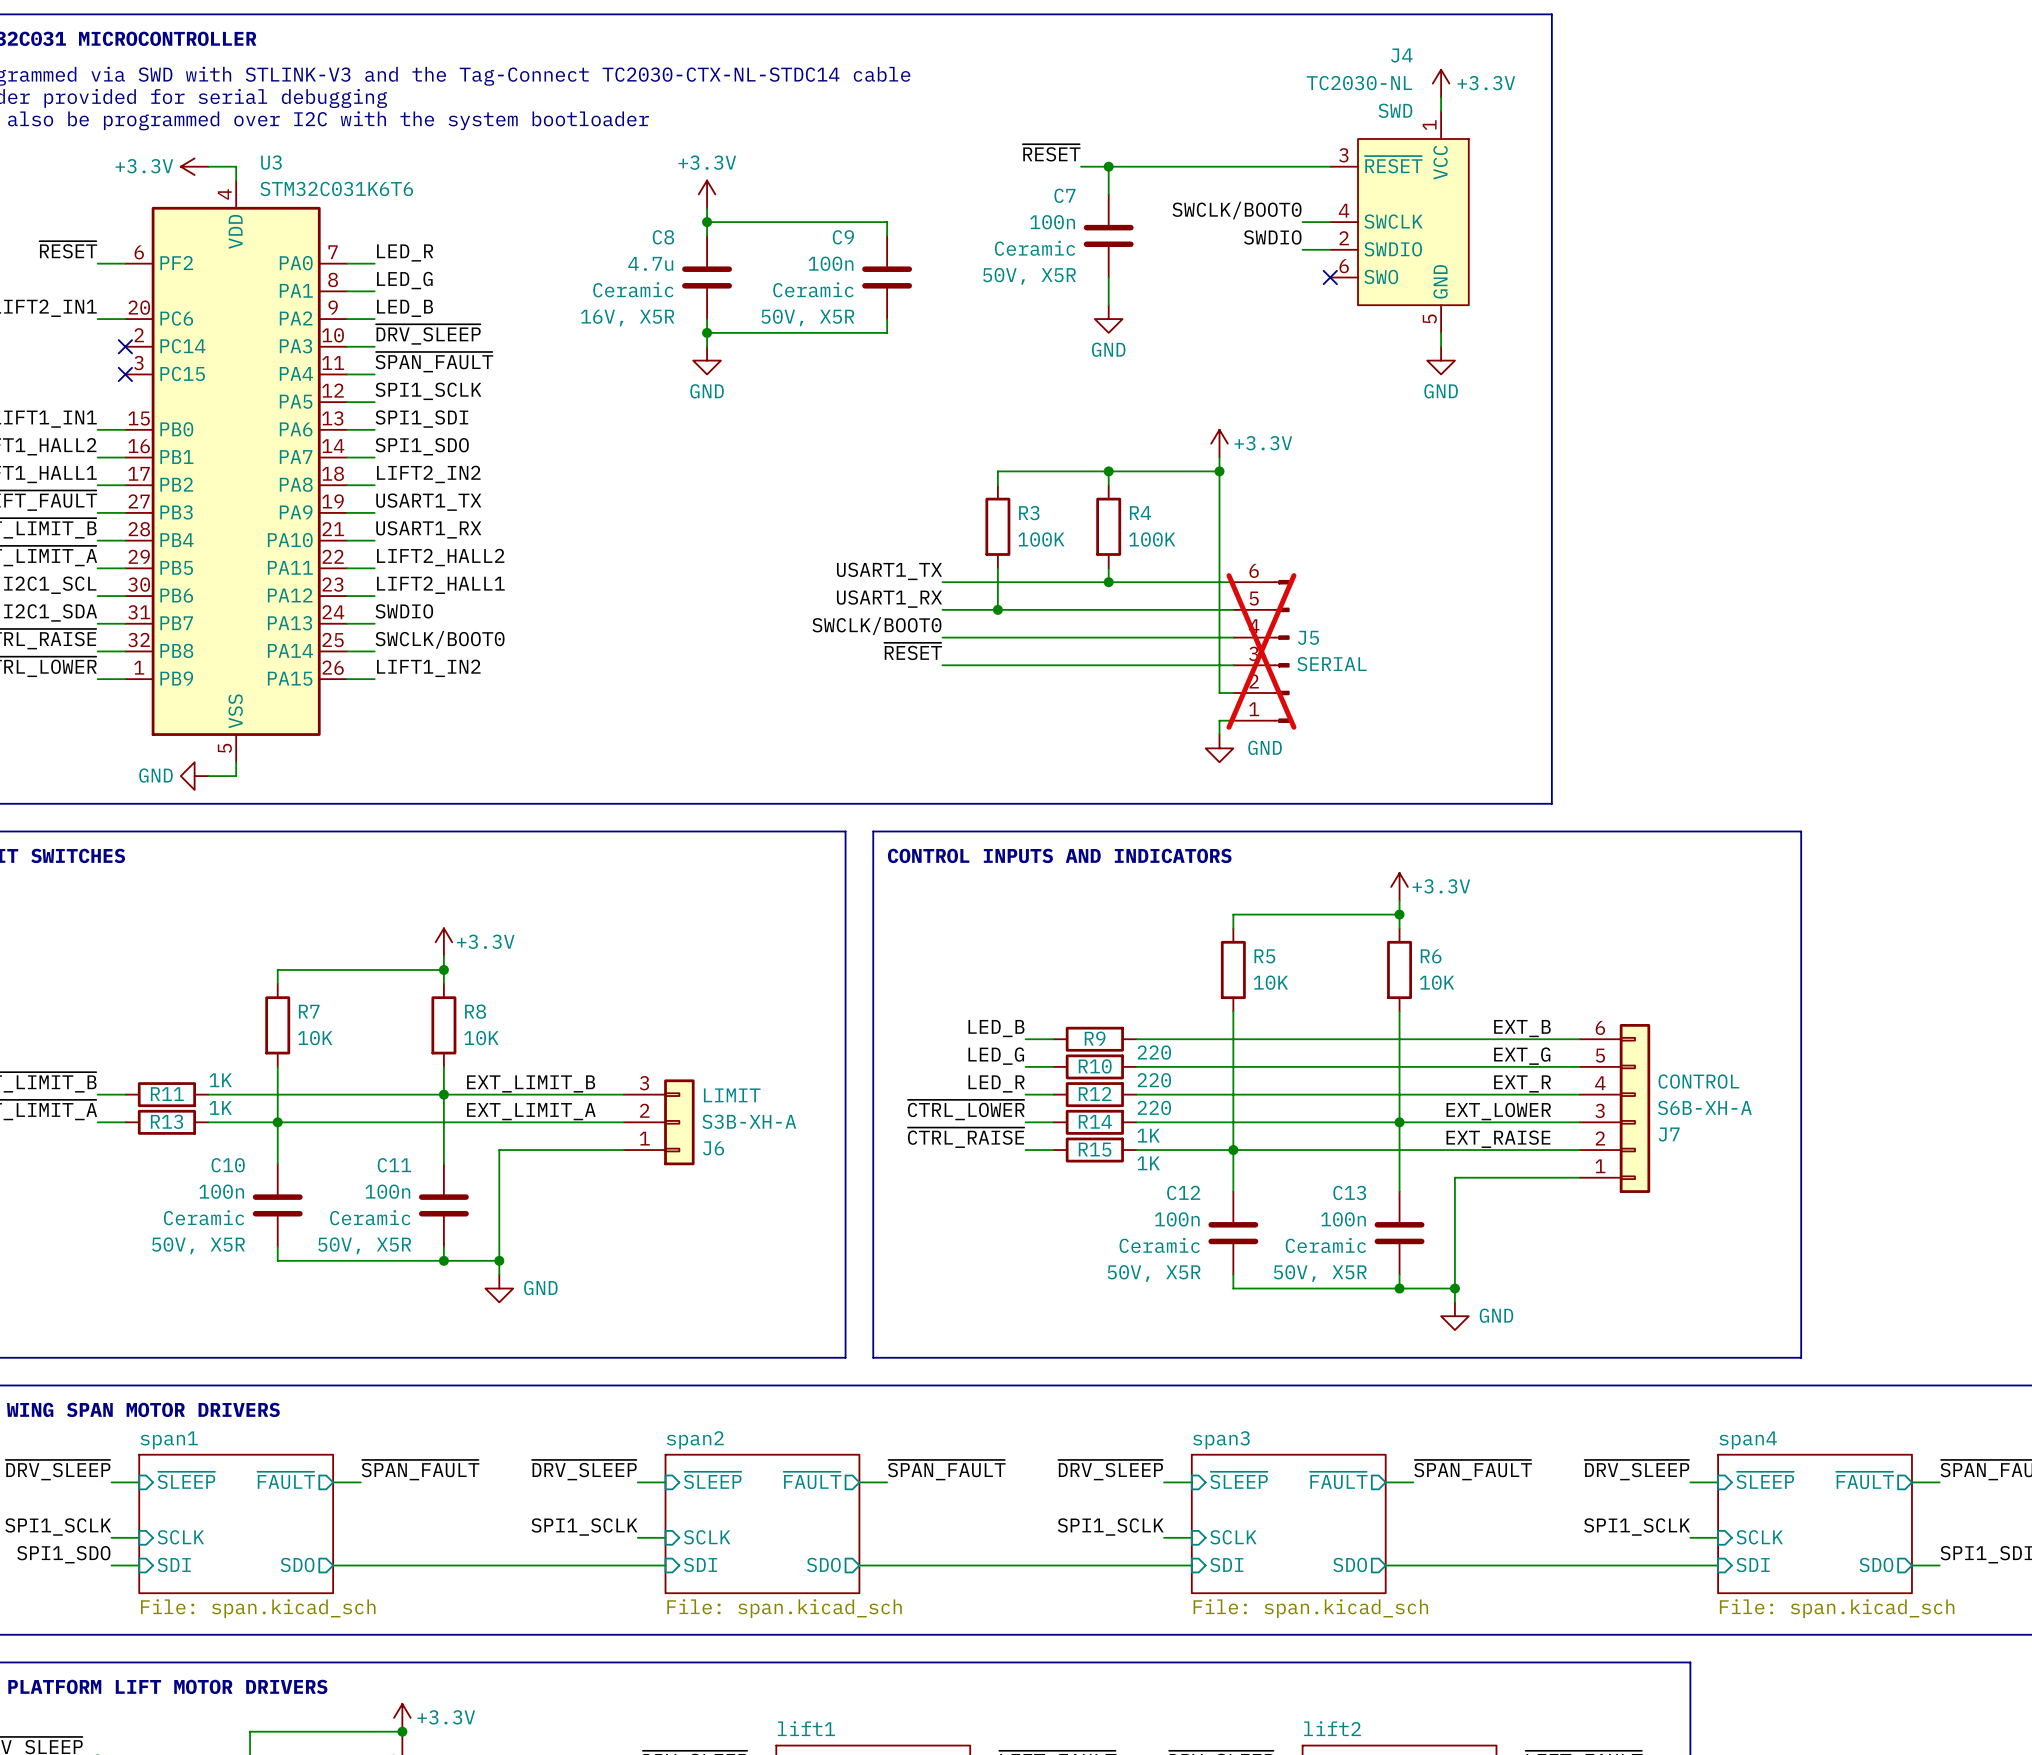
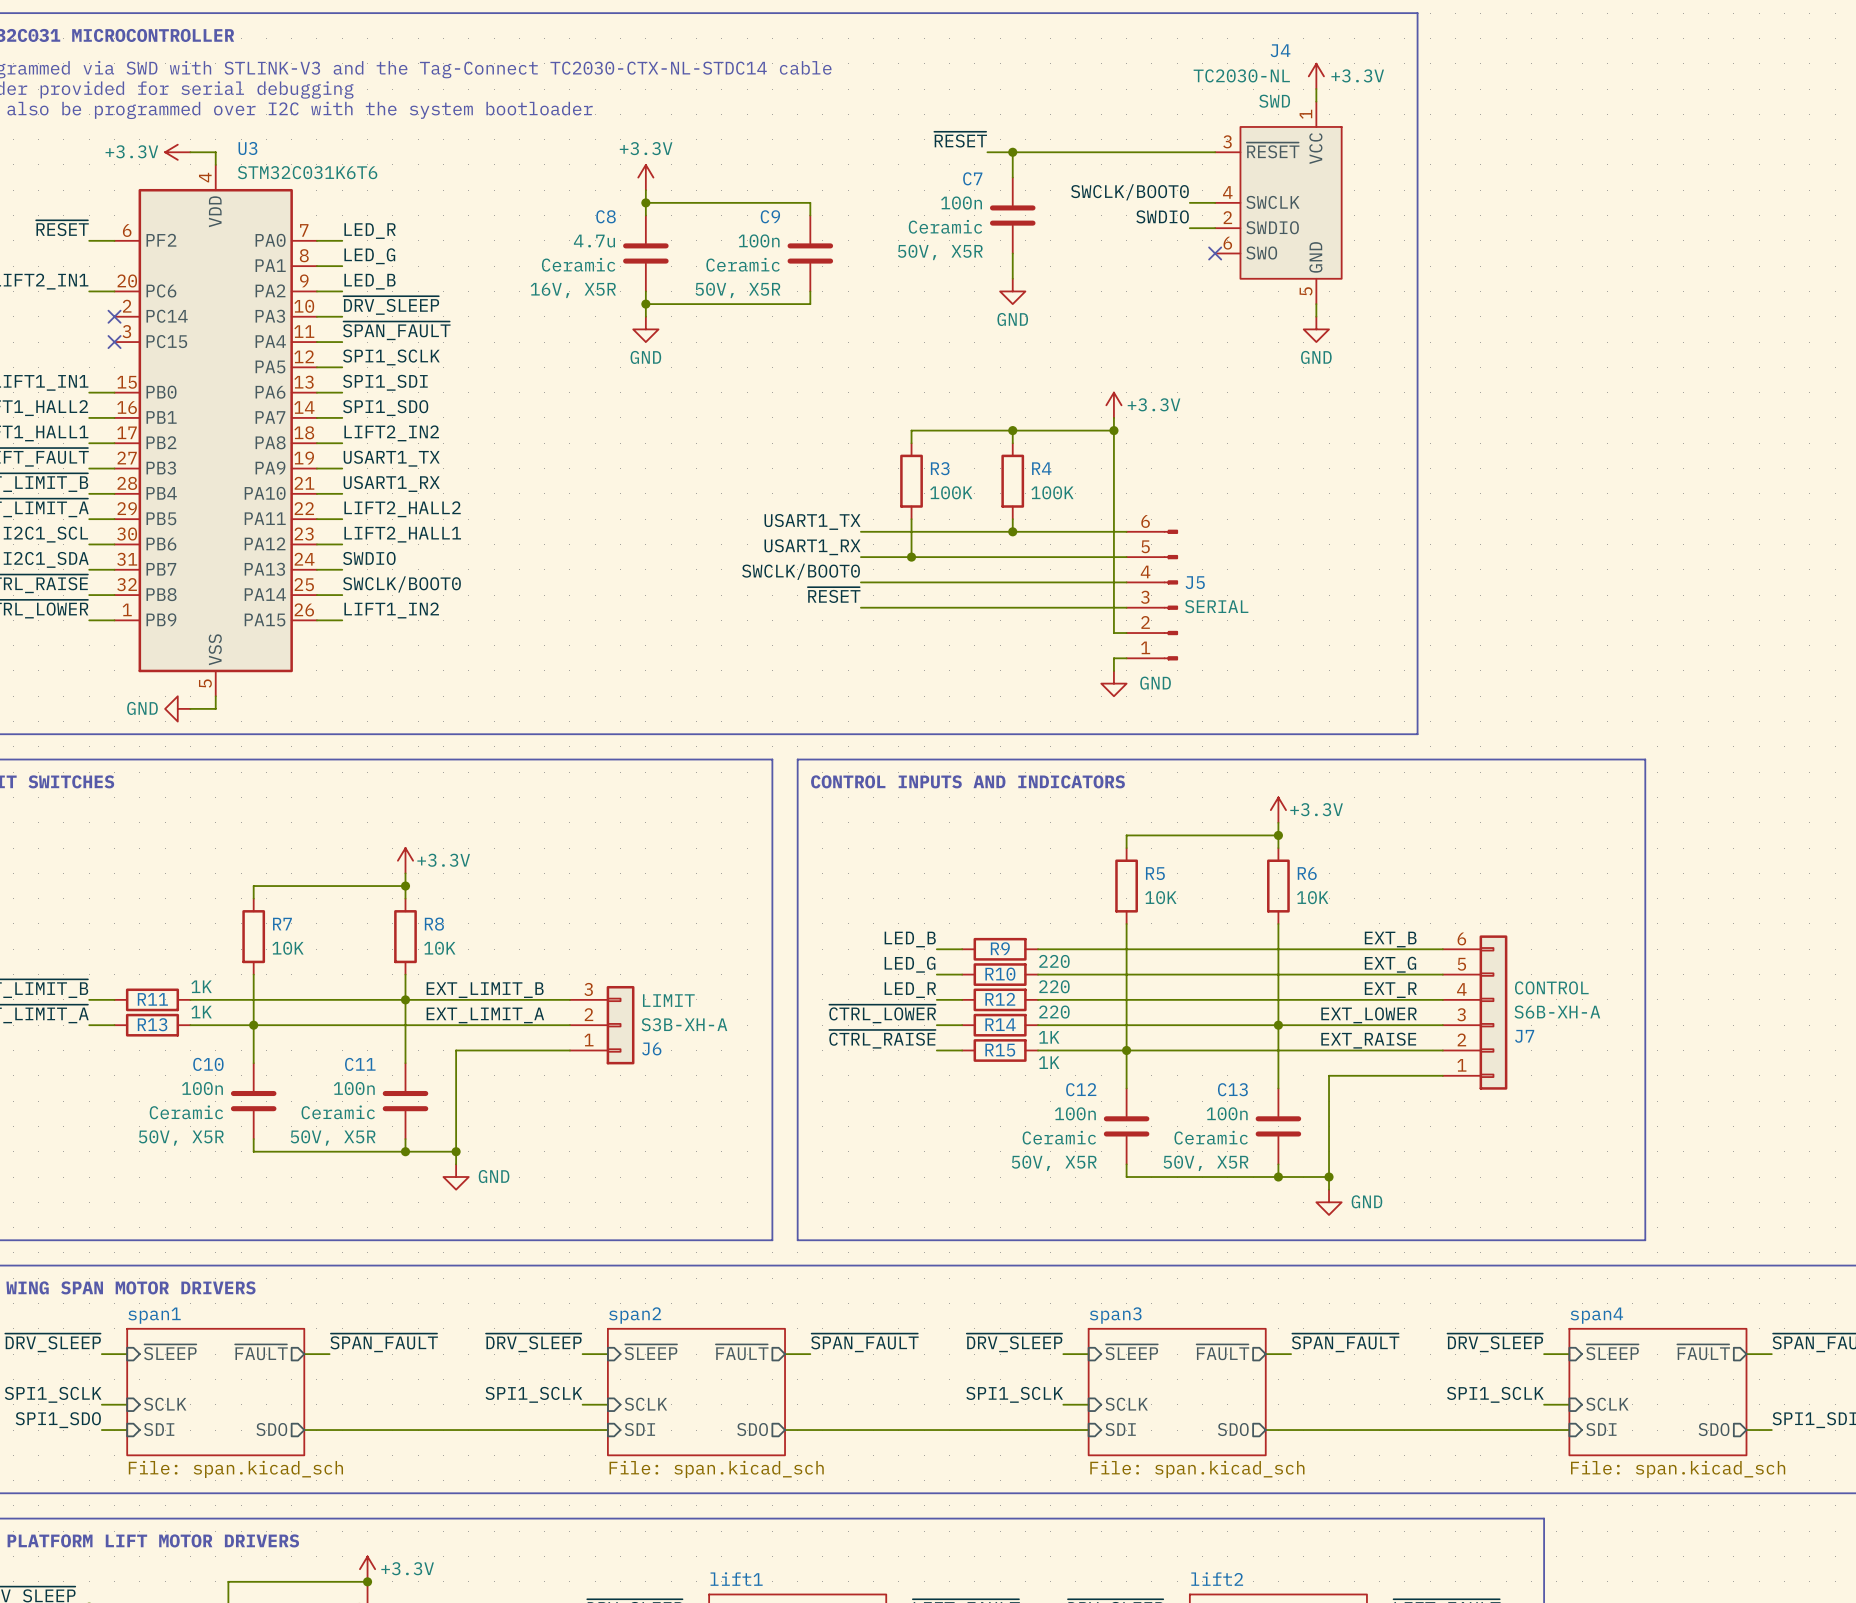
J5 do-not-place cross: (1261, 651) -> none

